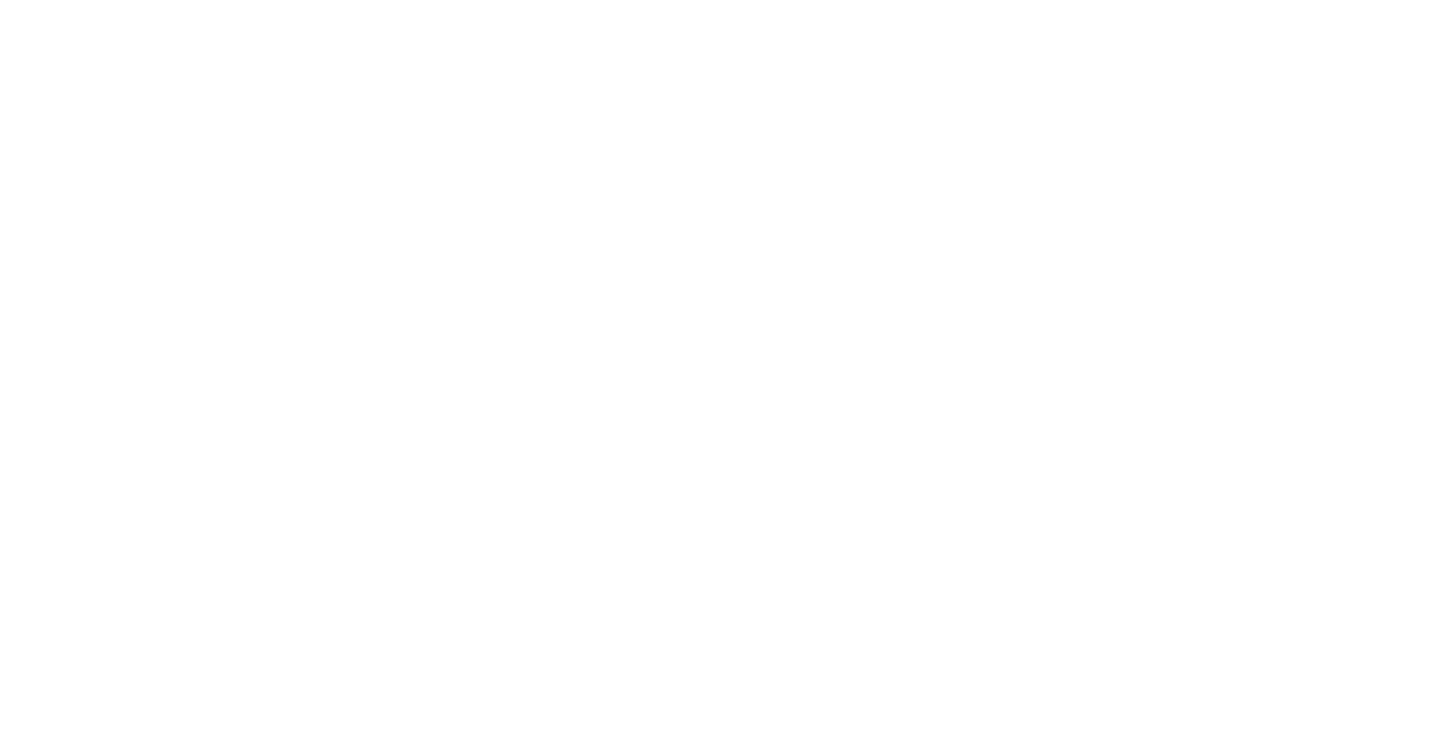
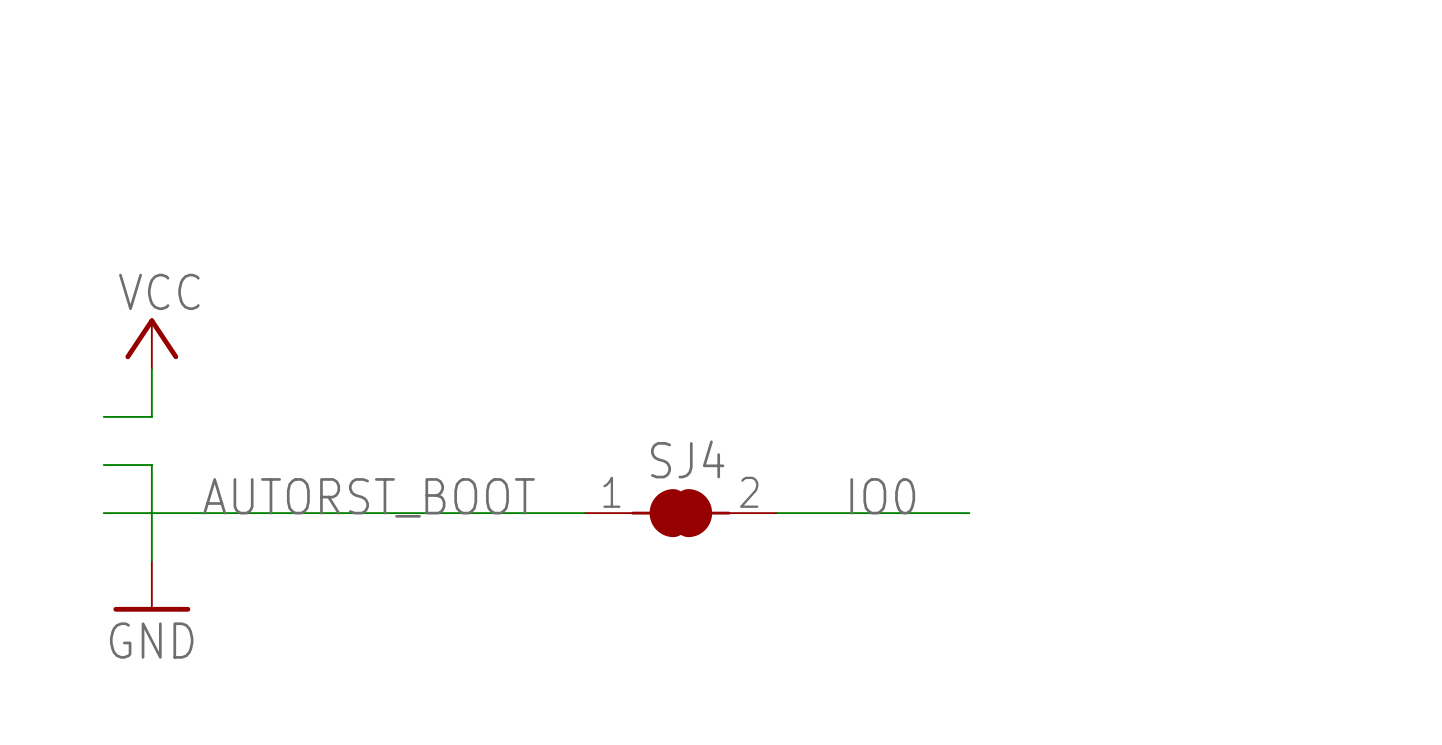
power symbol: none -> VCC (151, 343)
wire: none -> (151, 368) (151, 416) (103, 416)
wire: none -> (103, 465) (151, 465) (151, 561)
label: none -> IO0 (882, 496)
label: none -> AUTORST_BOOT (369, 497)
wire: none -> (103, 513) (584, 513)
SJ4: none -> (680, 513)
wire: none -> (777, 513) (969, 513)
power symbol: none -> GND (151, 586)

